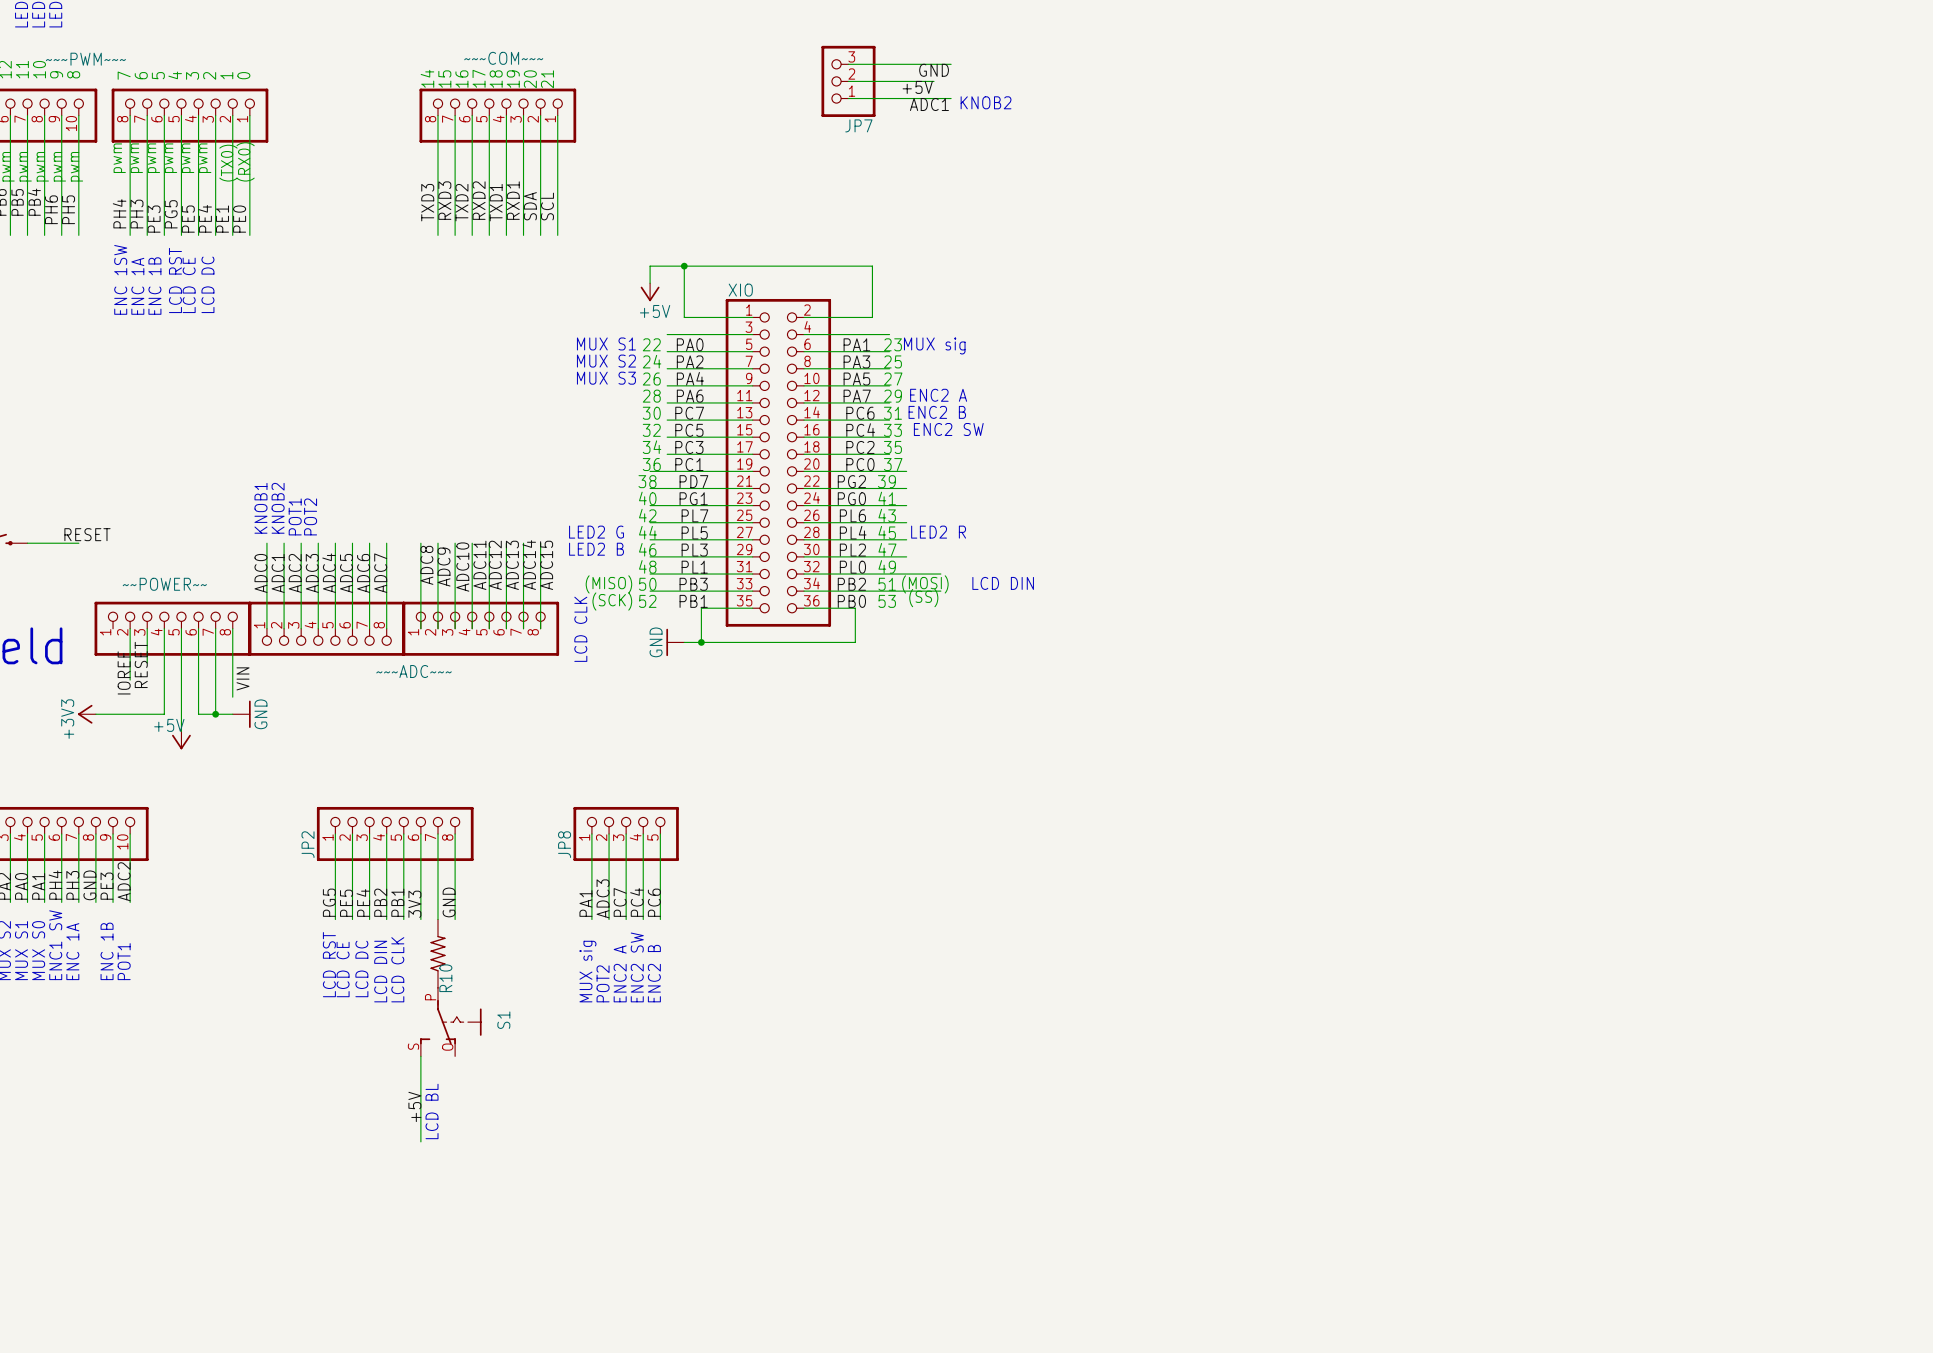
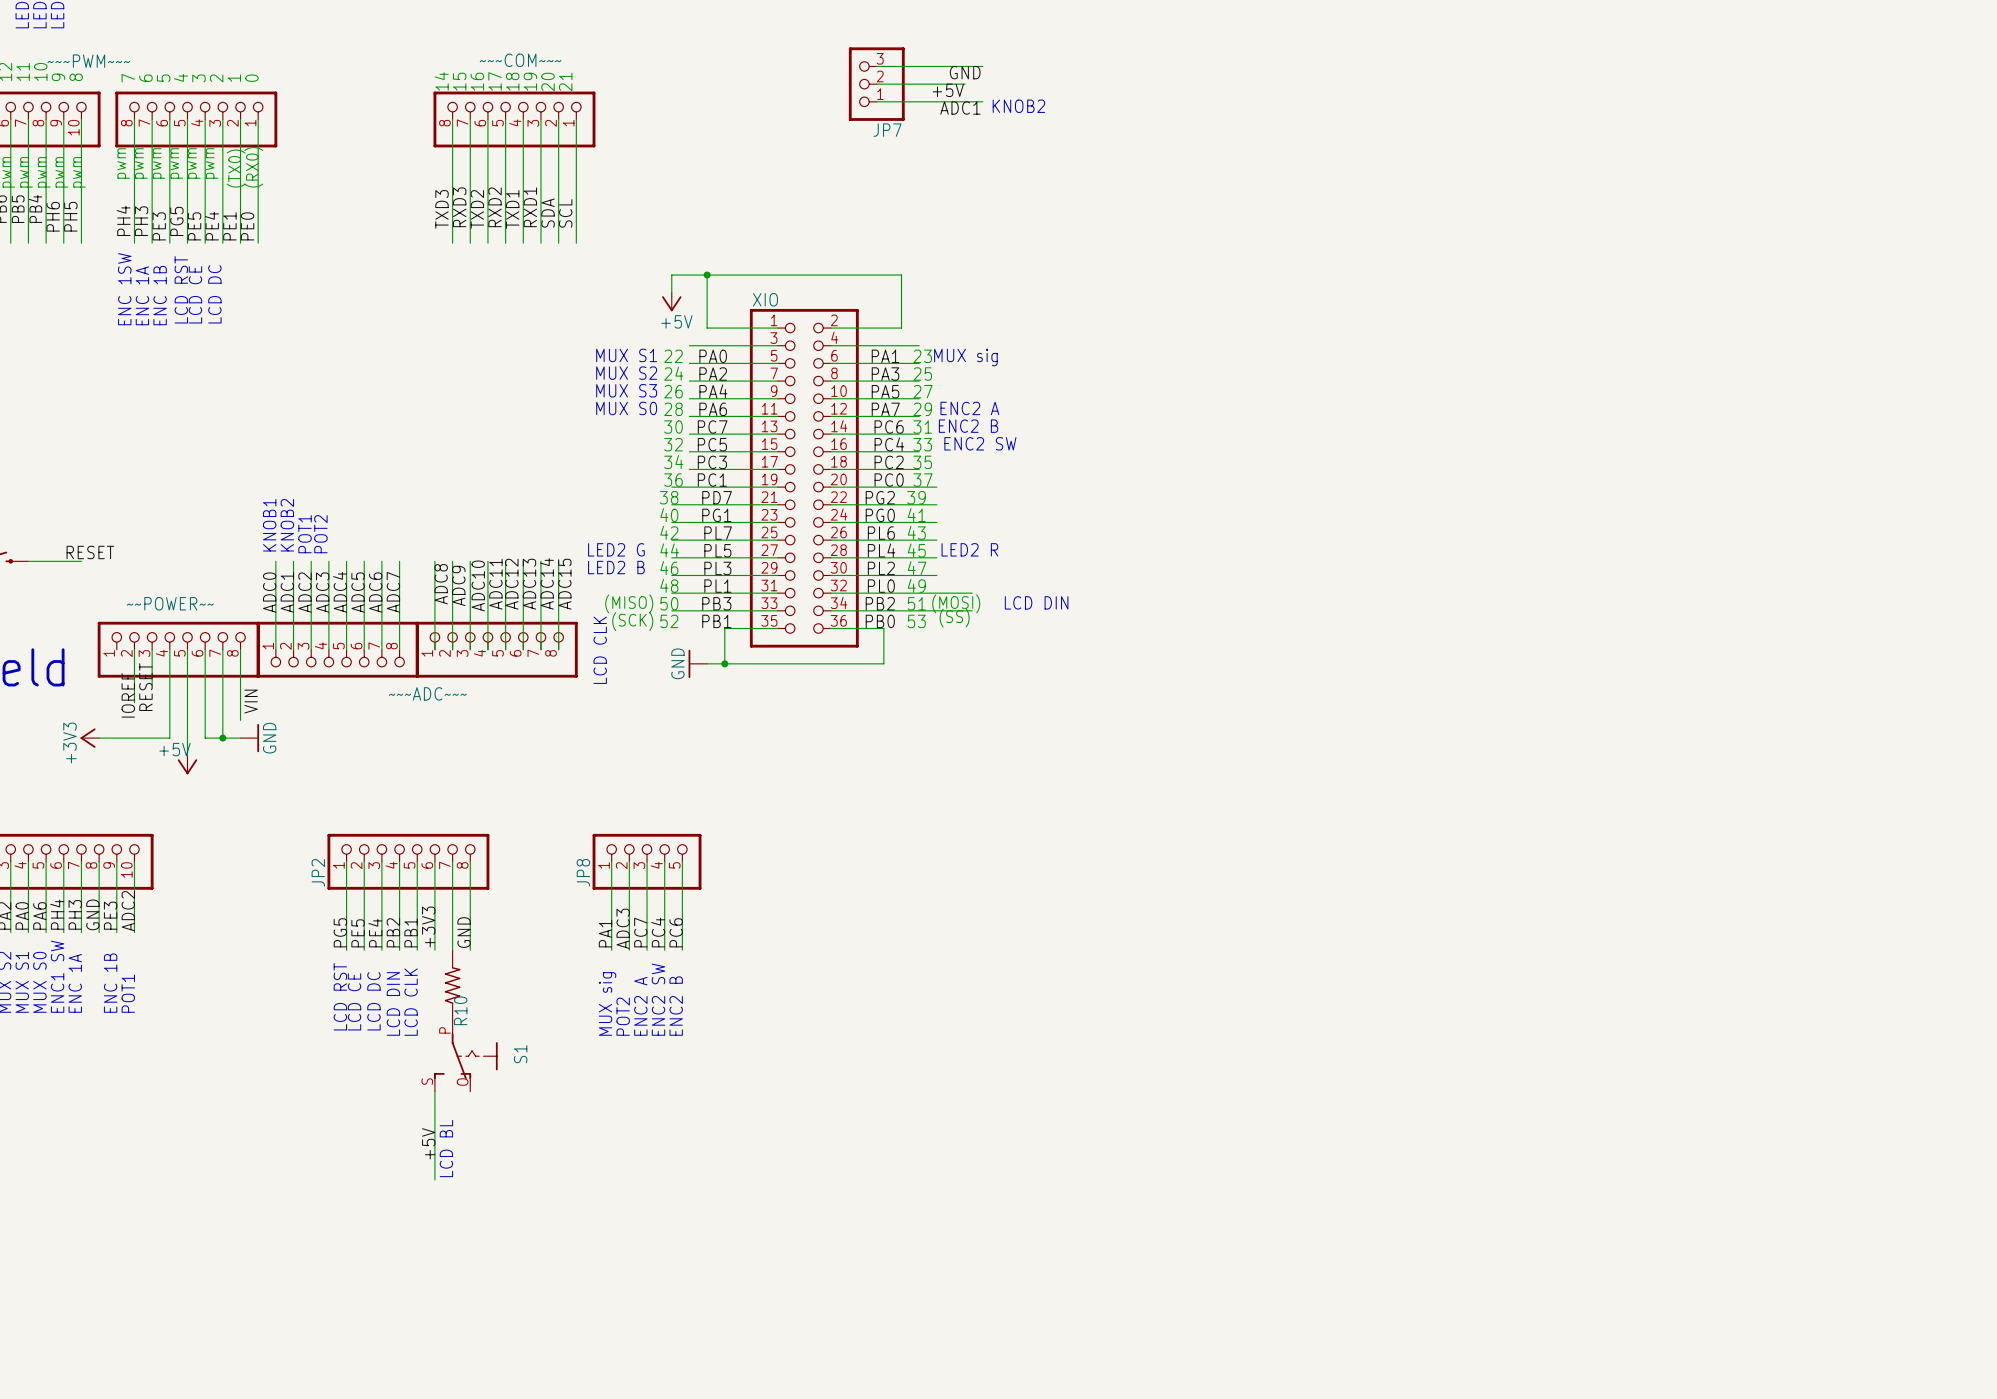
text: none -> MUX S0 (626, 408)
label: PA1 (38, 886) -> PA6 (39, 915)
label: 3V3 (414, 904) -> +3V3 (428, 926)

